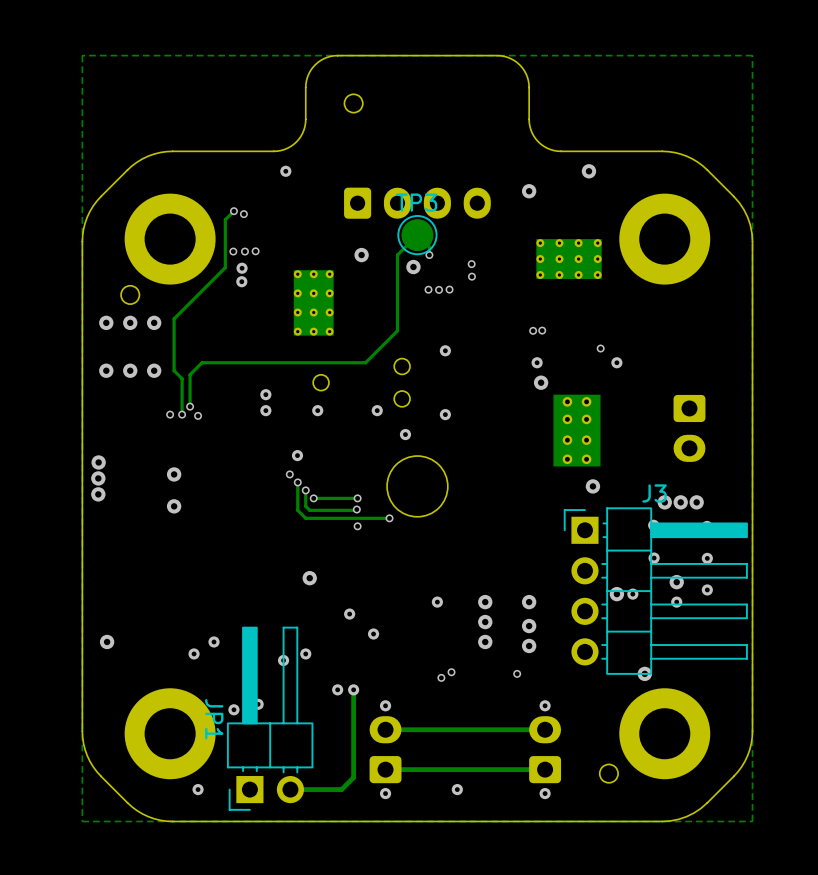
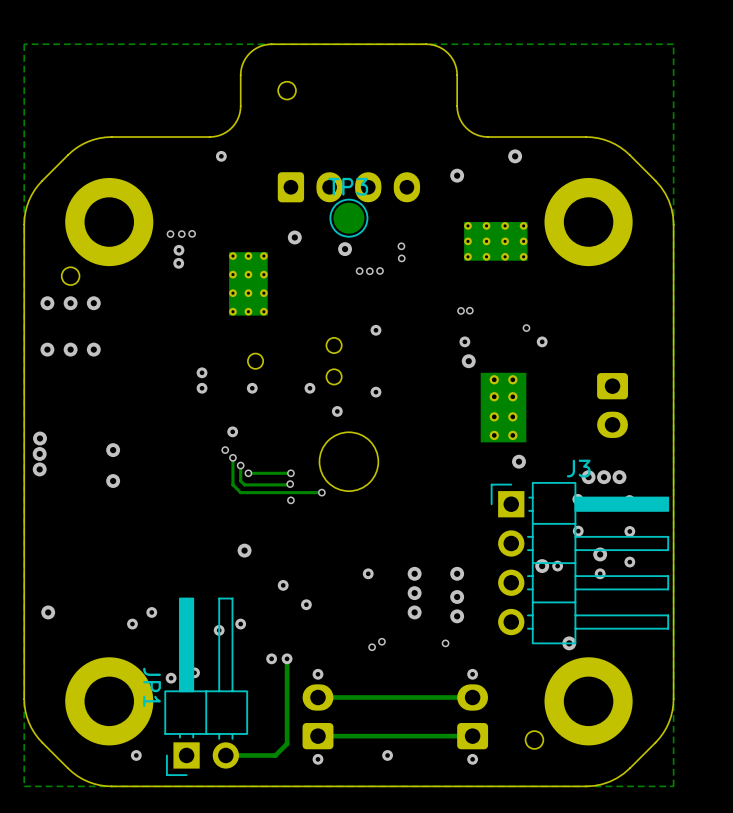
track: (233, 211) (225, 219) (225, 267) (174, 318) (174, 370) (182, 378) (182, 414) -> none
via: (233, 211) -> none
via: (243, 214) -> none
track: (429, 255) (429, 247) (417, 235) (397, 255) (397, 330) (365, 362) (202, 362) (190, 374) (190, 406) -> none
via: (429, 255) -> none
via: (190, 406) -> none
via: (170, 414) -> none
via: (182, 414) -> none
via: (198, 415) -> none

